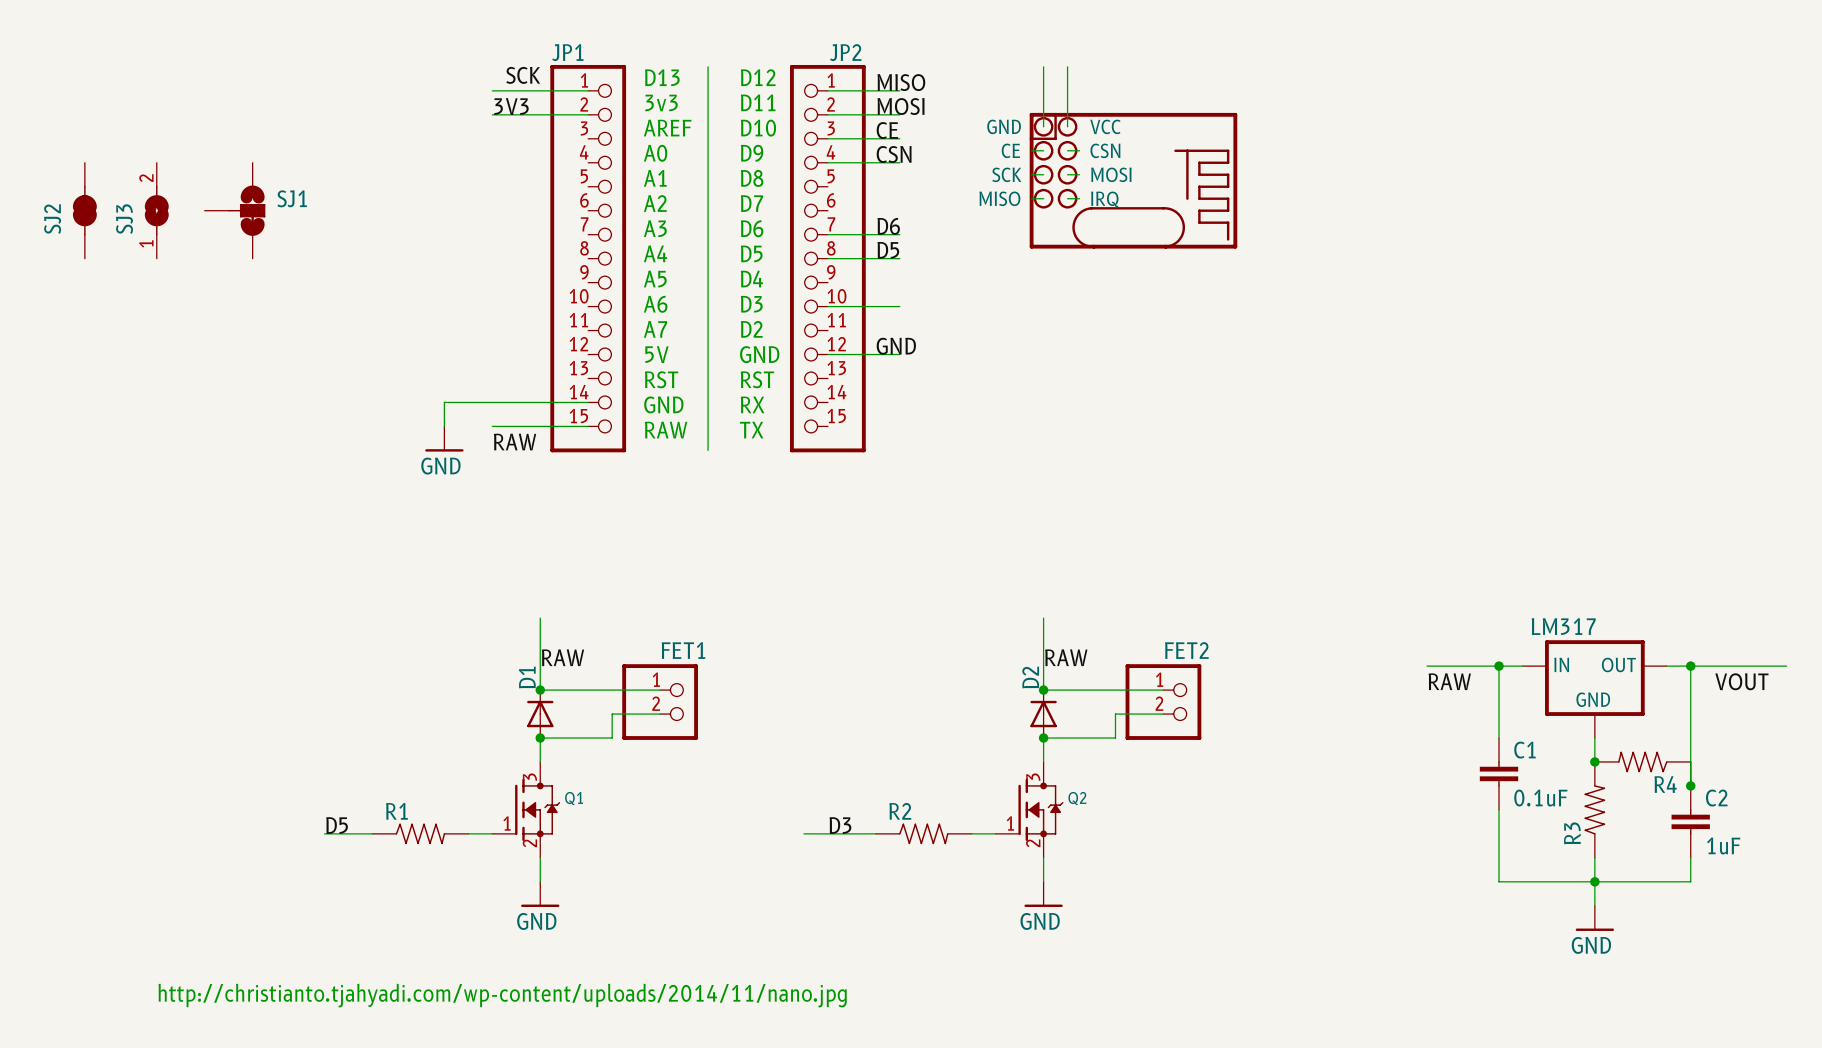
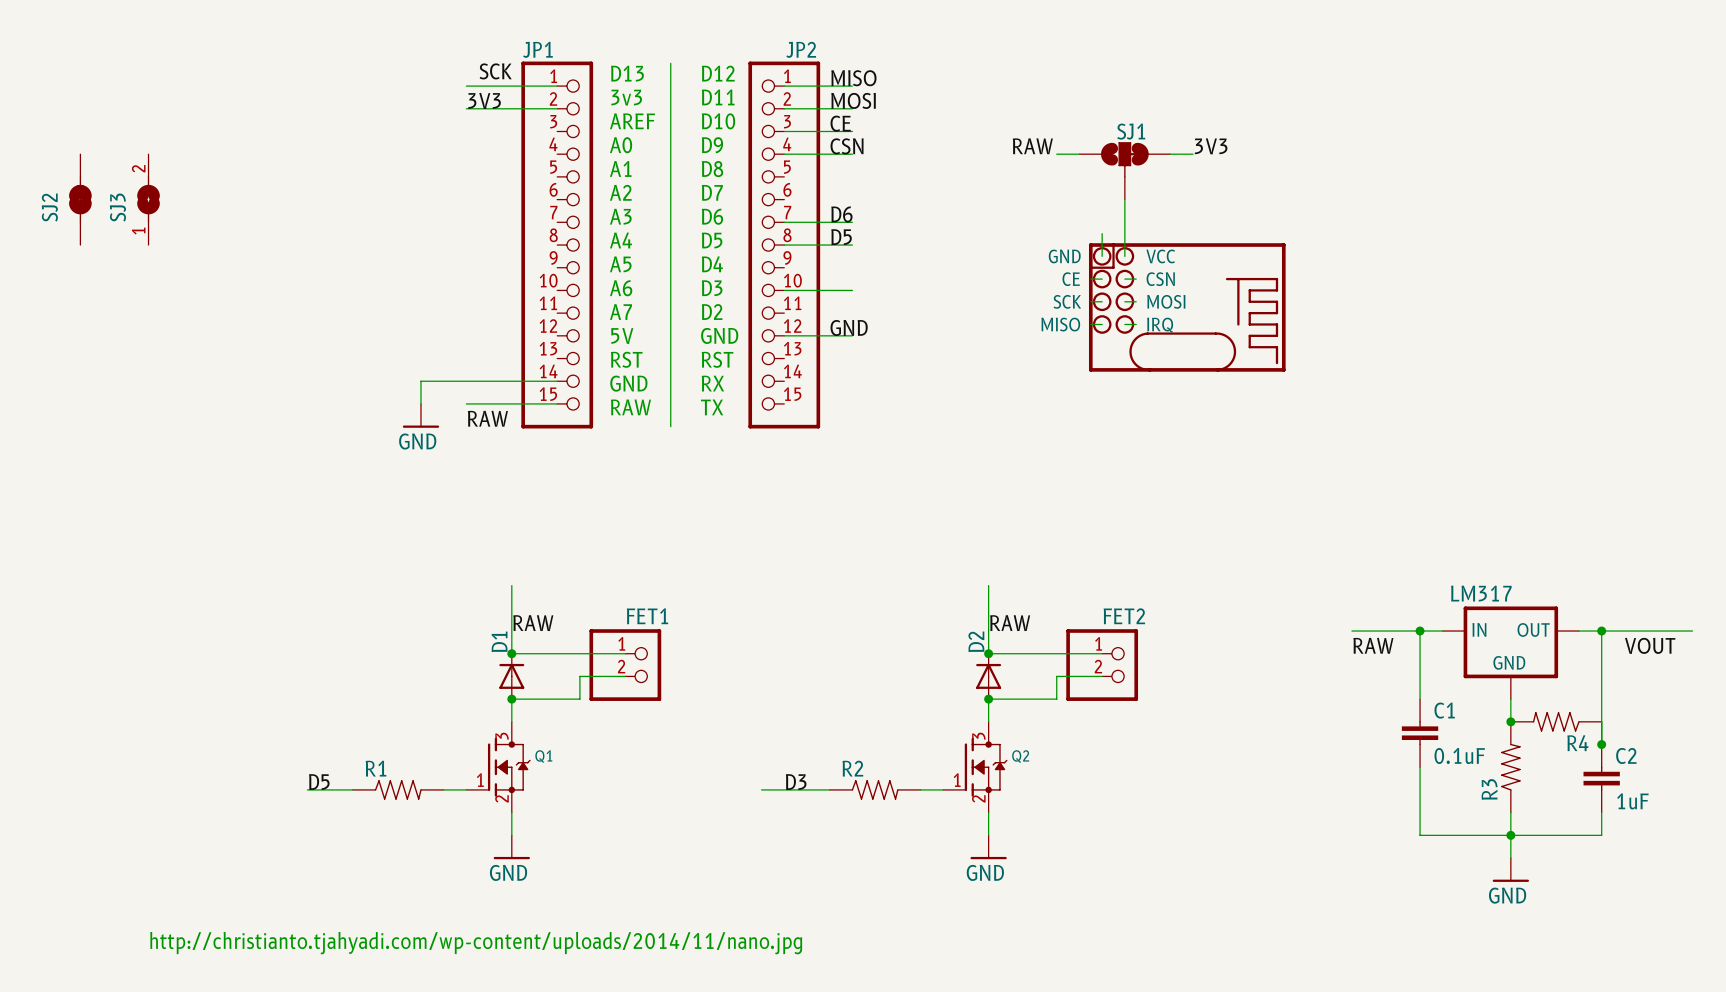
wire: (1043, 66) (1043, 126) -> none
wire: (1067, 66) (1067, 126) -> (1124, 199) (1124, 256)
wire: (1031, 150) (1043, 150) -> (1090, 279) (1102, 279)
wire: (1067, 150) (1079, 150) -> (1124, 279) (1136, 279)
label: none -> RAW (1032, 146)
label: none -> 3V3 (1211, 146)
wire: none -> (1056, 154) (1079, 154)
wire: none -> (1170, 154) (1192, 154)
wire: (1031, 174) (1043, 174) -> (1090, 301) (1102, 301)
wire: (1067, 174) (1079, 174) -> (1124, 301) (1136, 301)
part position: (1133, 180) -> (1187, 307)
SJ1 name position: SJ1 (292, 198) -> SJ1 (1131, 131)
wire: (1031, 198) (1043, 198) -> (1090, 324) (1102, 324)
wire: (1067, 198) (1079, 198) -> (1124, 324) (1136, 324)
SJ1 position: (235, 210) -> (1124, 170)
SJ1 rotation: 0° (246, 210) -> 90° counterclockwise (1124, 159)
wire: none -> (1102, 233) (1102, 256)

